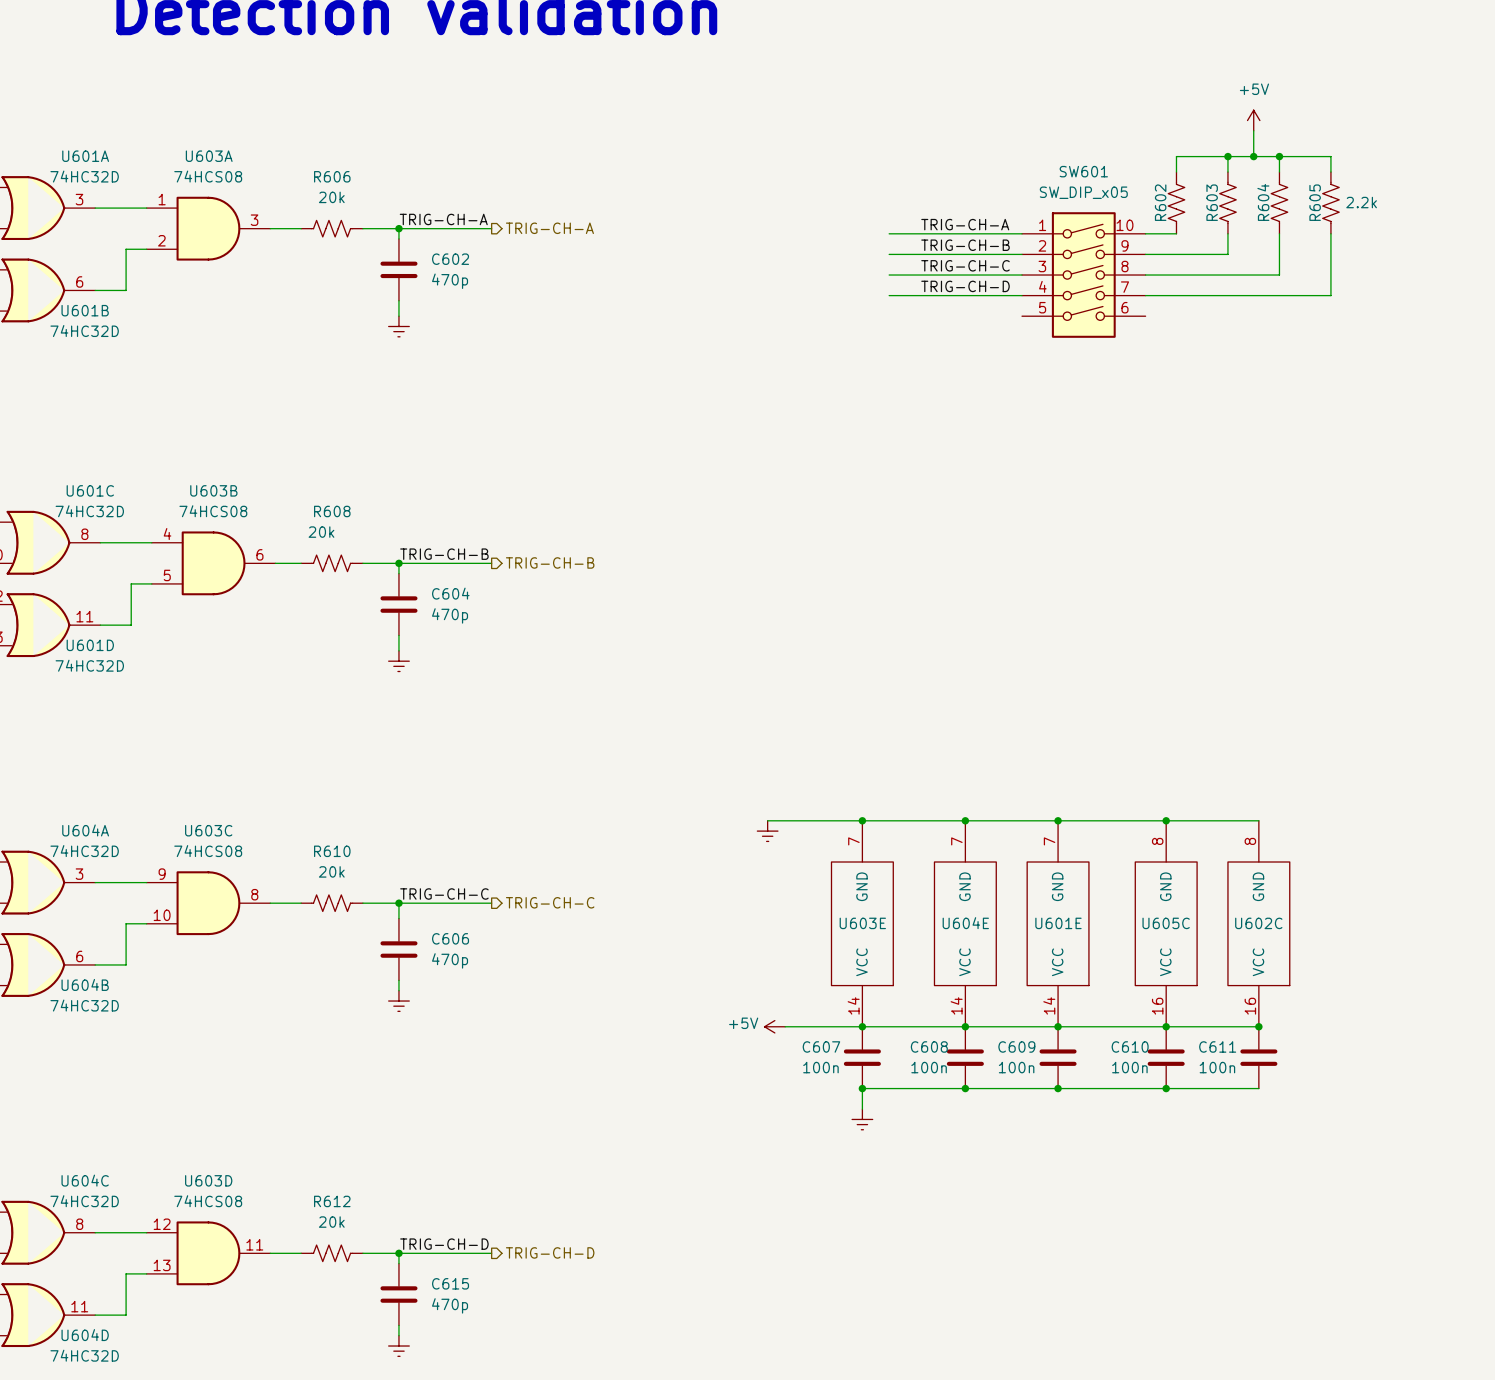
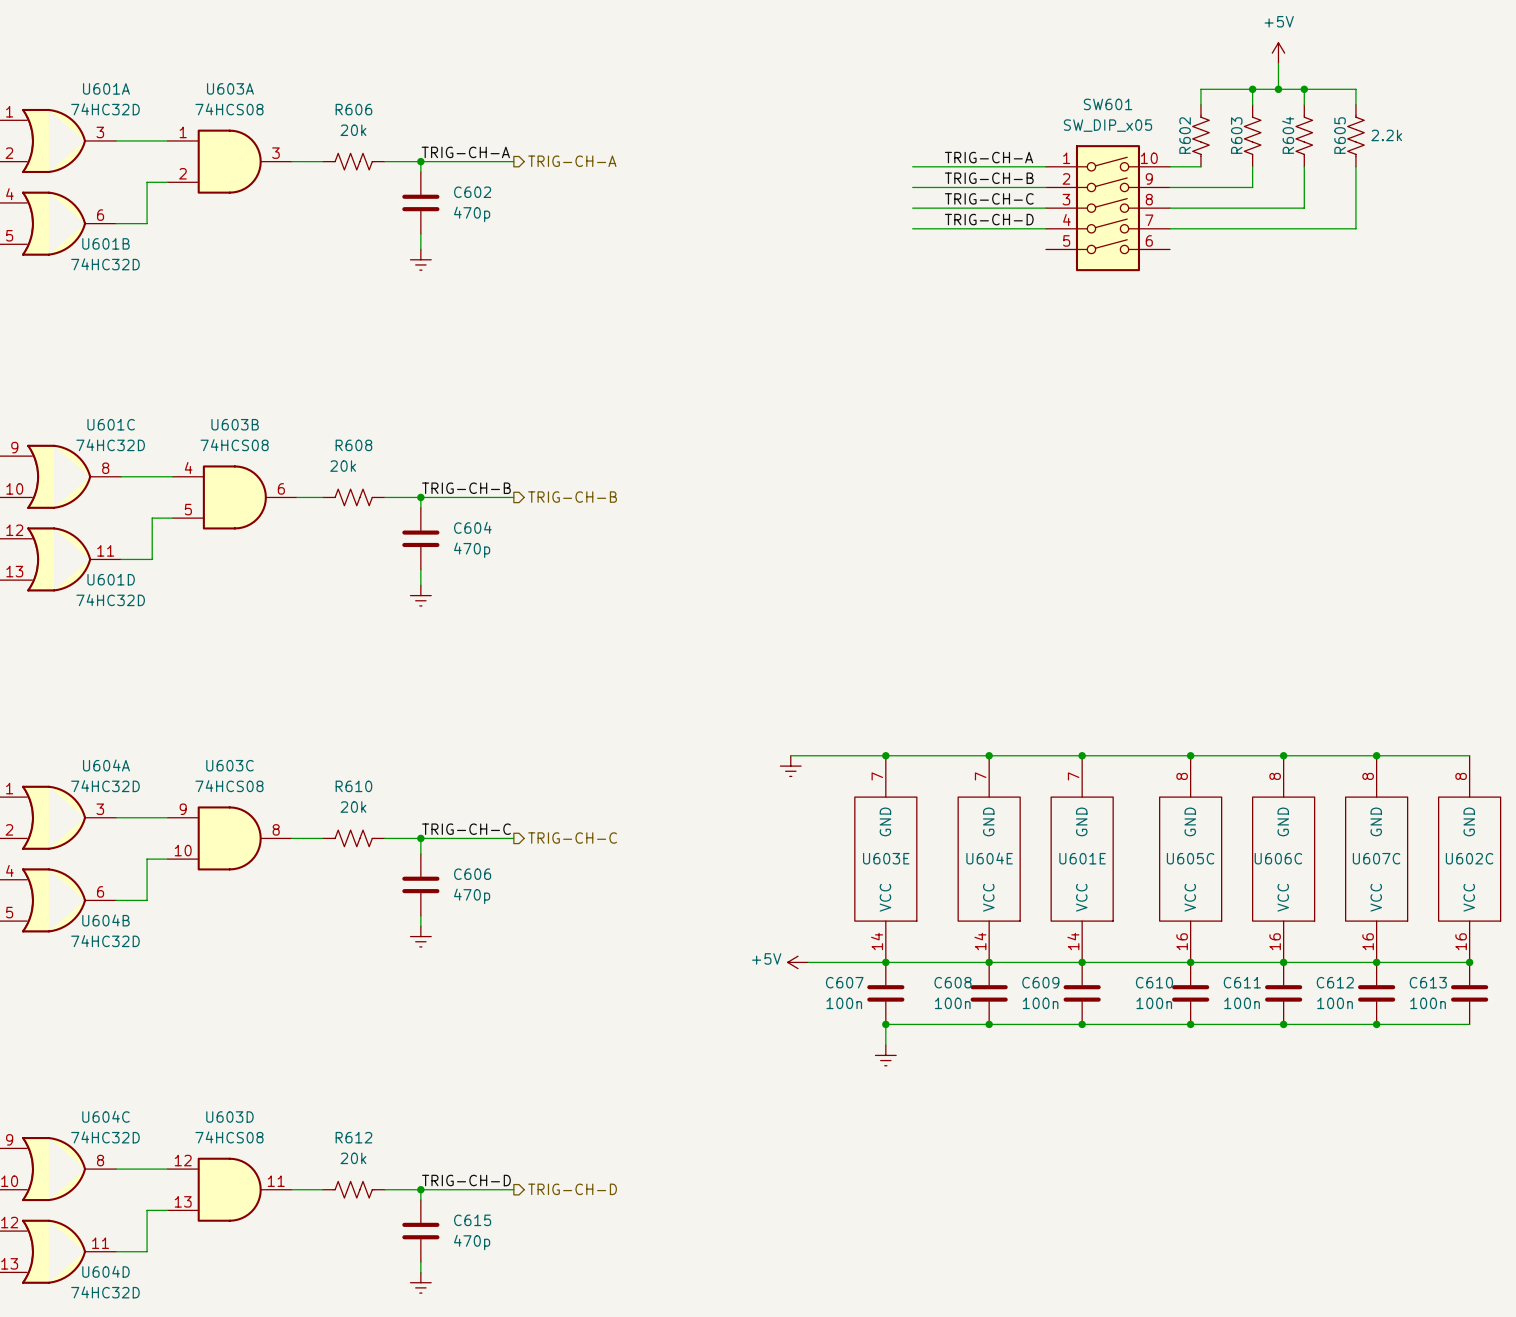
wire: none -> (1283, 755) (1469, 755)
junction: none -> (1283, 755)
junction: none -> (1376, 755)
U602C name: U602C (1258, 923) -> U606C (1278, 858)
U607C: none -> (1376, 859)
U602C: none -> (1469, 859)
wire: none -> (1283, 962) (1469, 962)
junction: none -> (1376, 962)
junction: none -> (1469, 962)
C612: none -> 100n (1376, 993)
C613: none -> 100n (1469, 993)
wire: none -> (1283, 1024) (1469, 1024)
junction: none -> (1283, 1024)
junction: none -> (1376, 1024)

